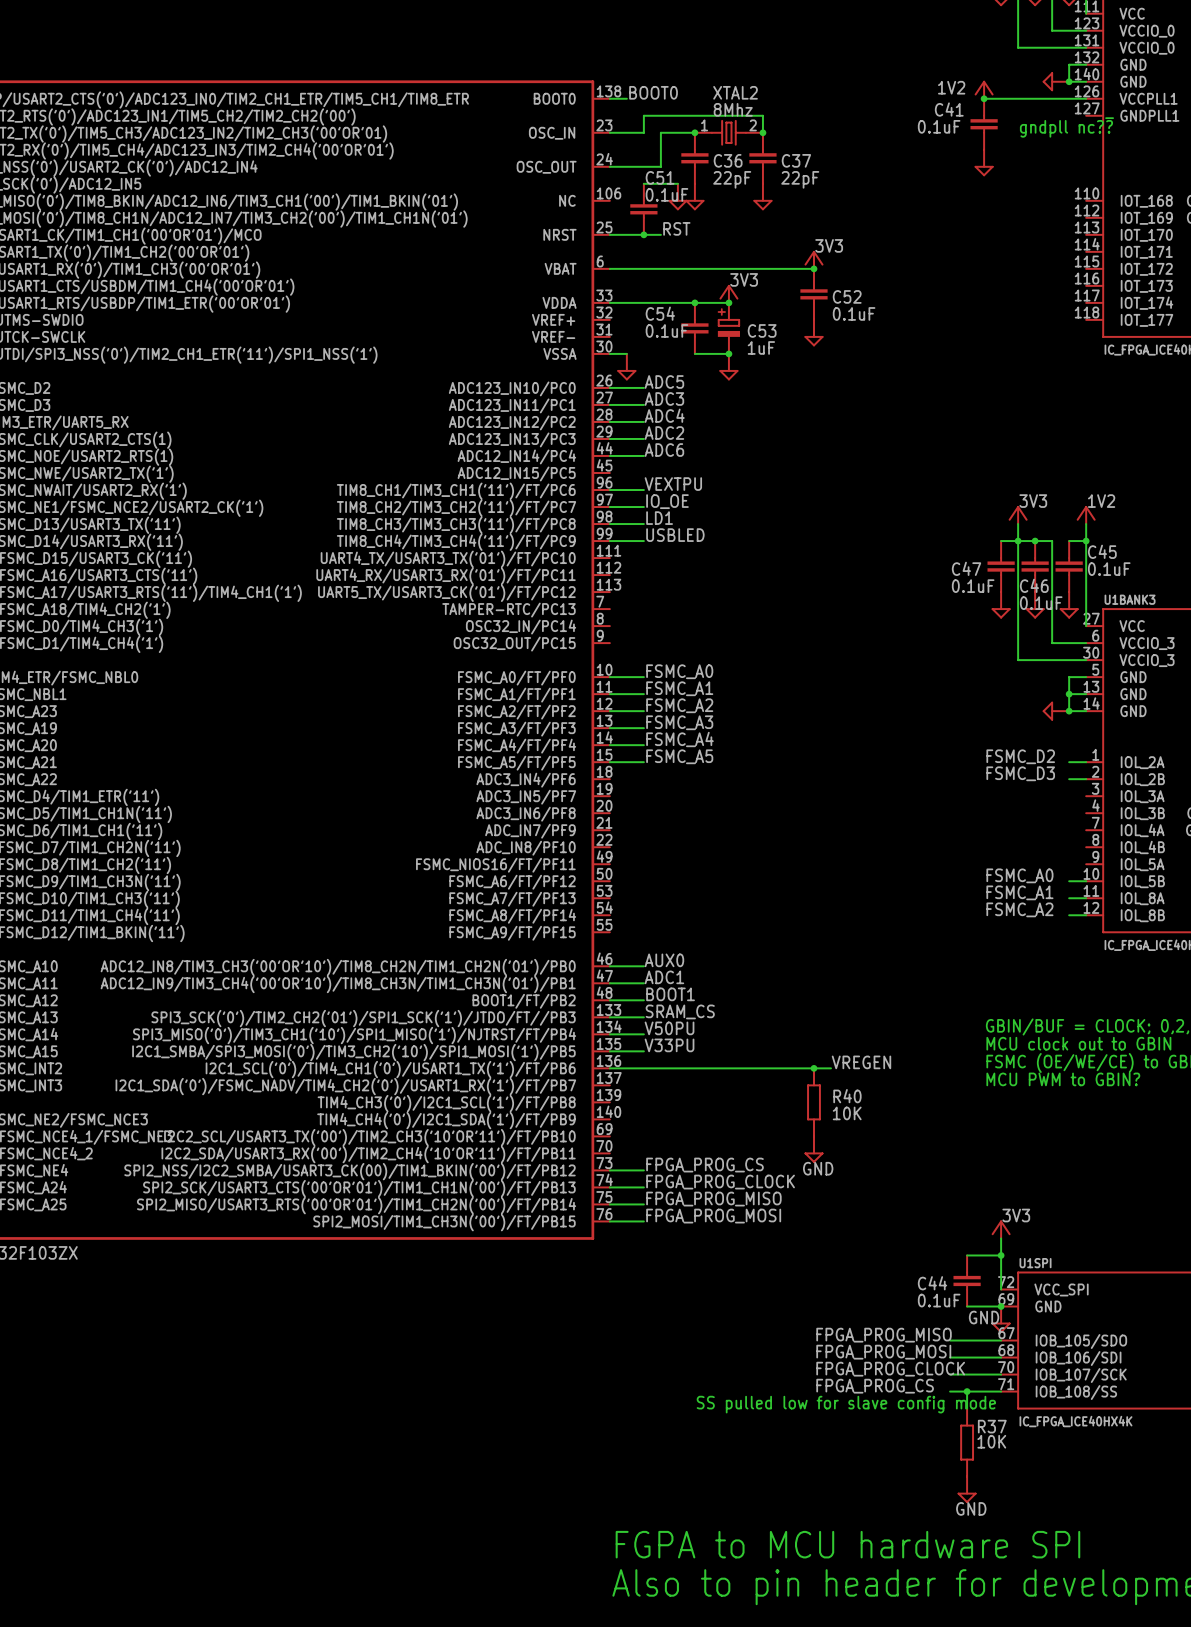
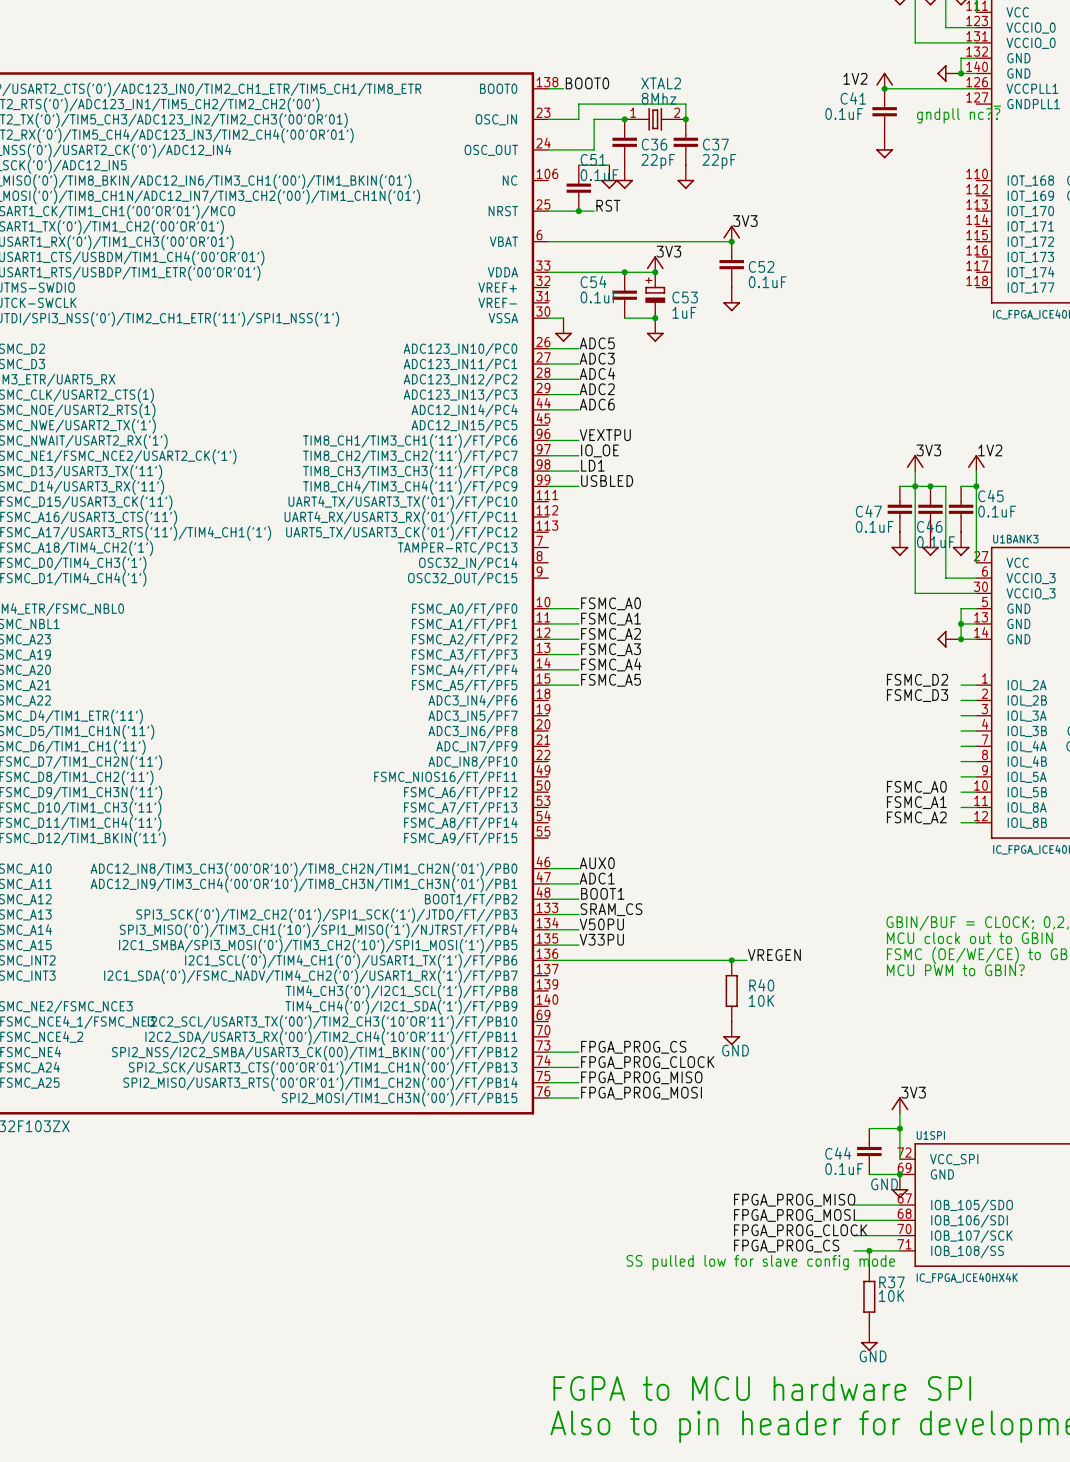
wire: none -> (961, 715) (976, 715)
wire: none -> (961, 731) (976, 731)
wire: none -> (961, 746) (976, 746)
wire: none -> (961, 761) (976, 761)
wire: none -> (961, 776) (976, 776)

